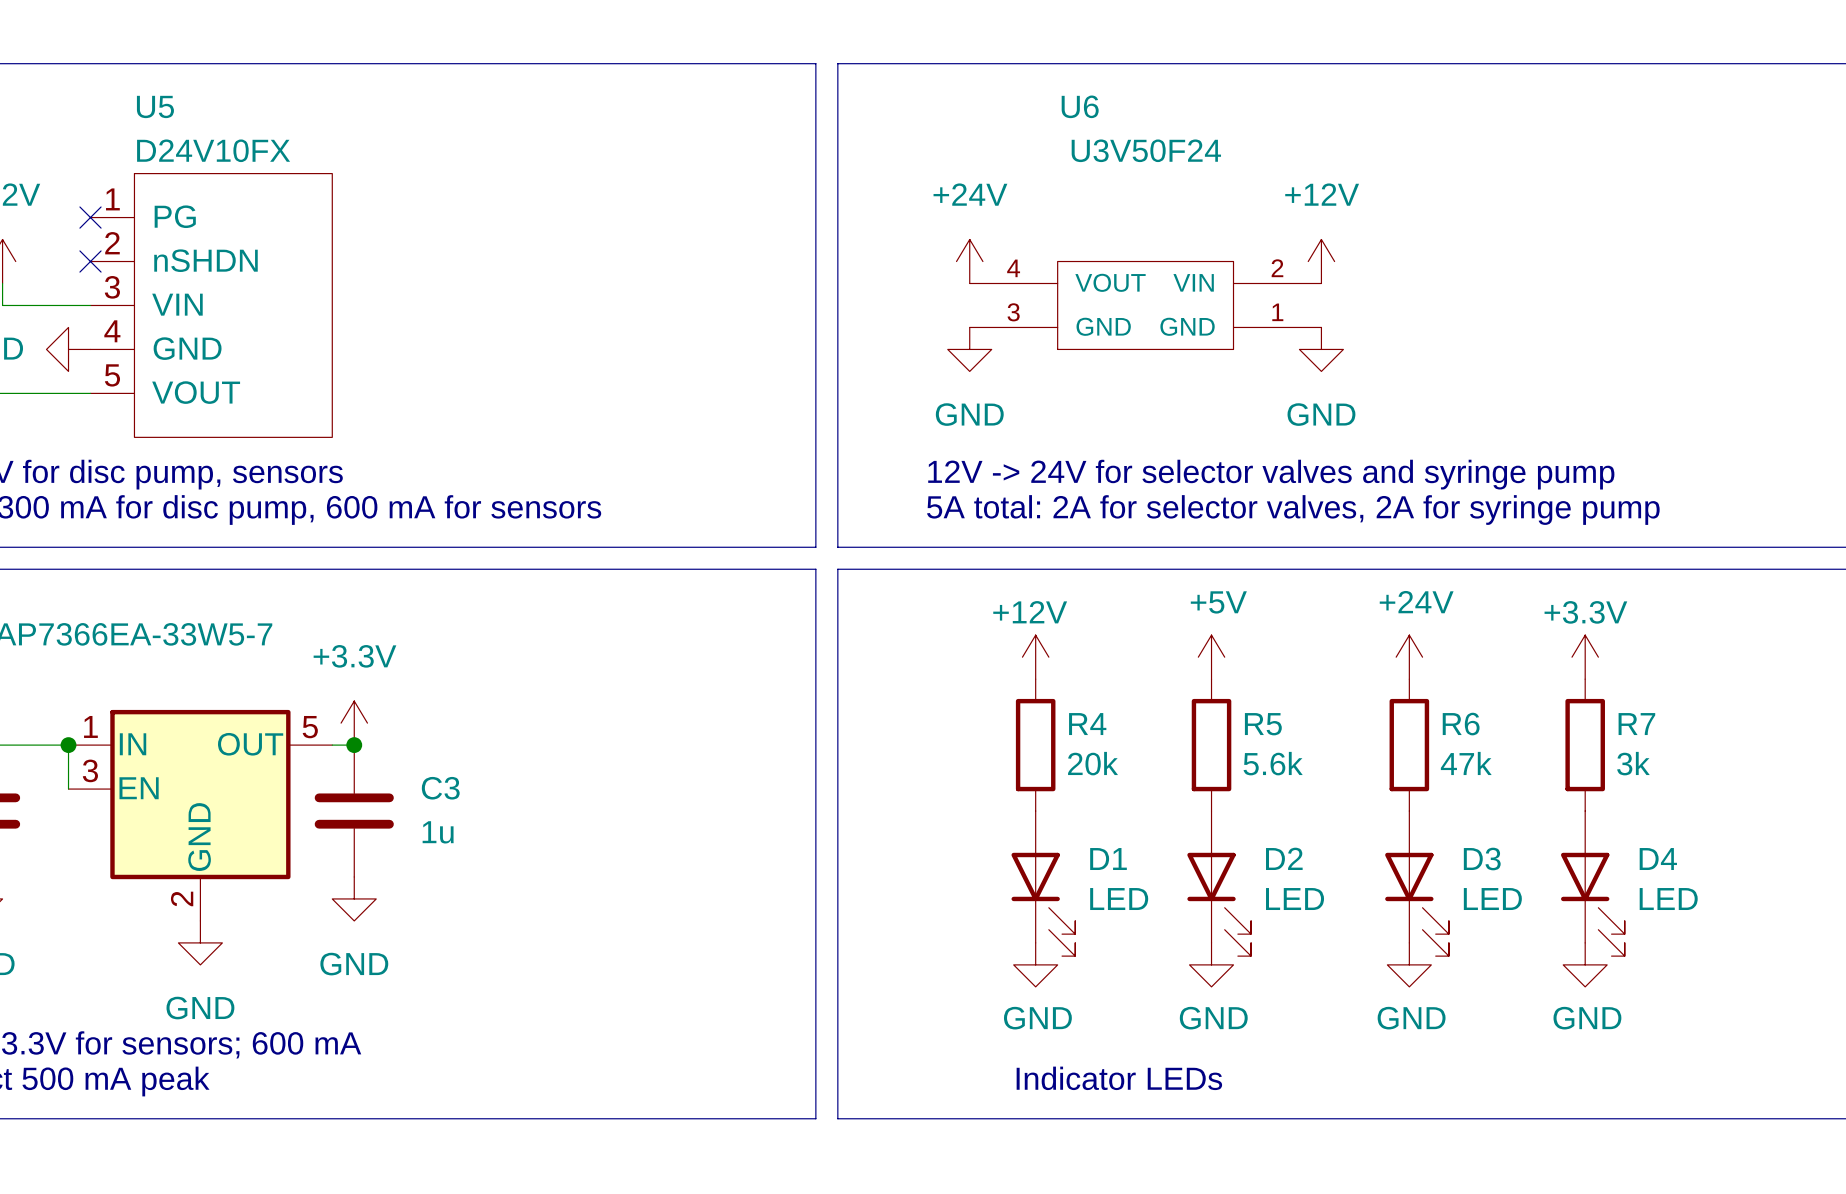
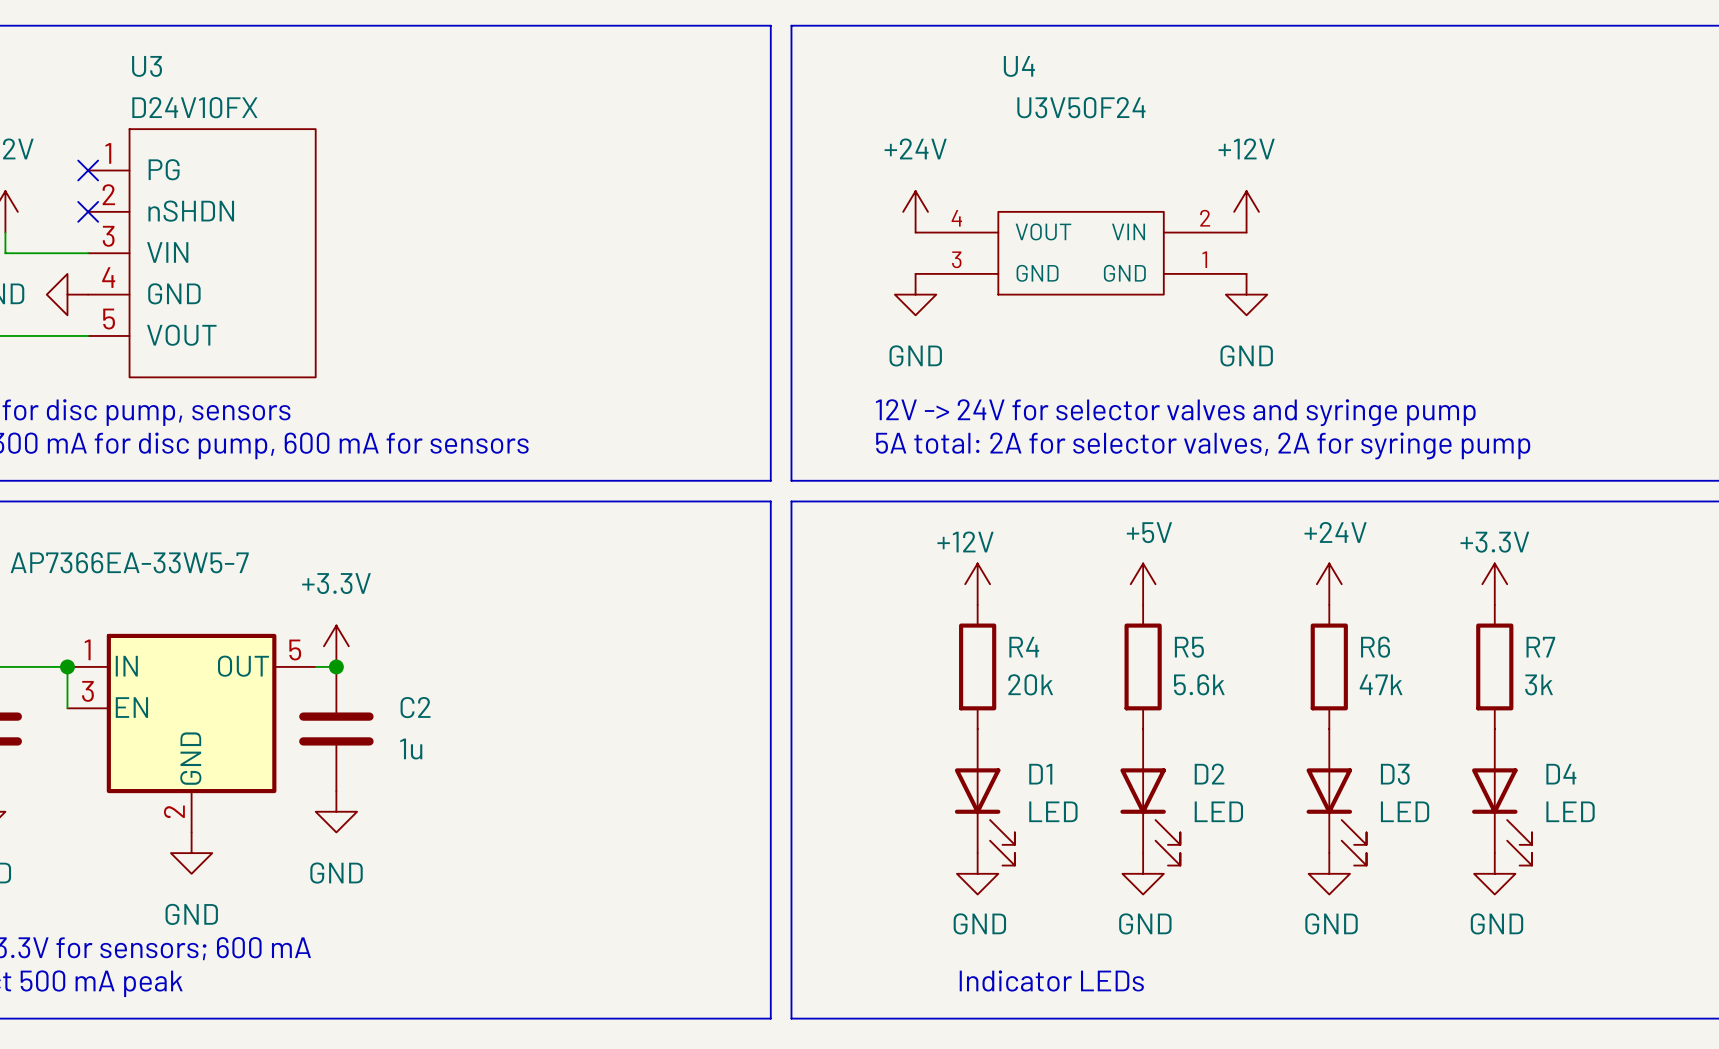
U5 name: U5 (155, 106) -> U3 (147, 66)
U6 name: U6 (1080, 106) -> U4 (1019, 66)
C3 name: C3 (440, 788) -> C2 (415, 707)

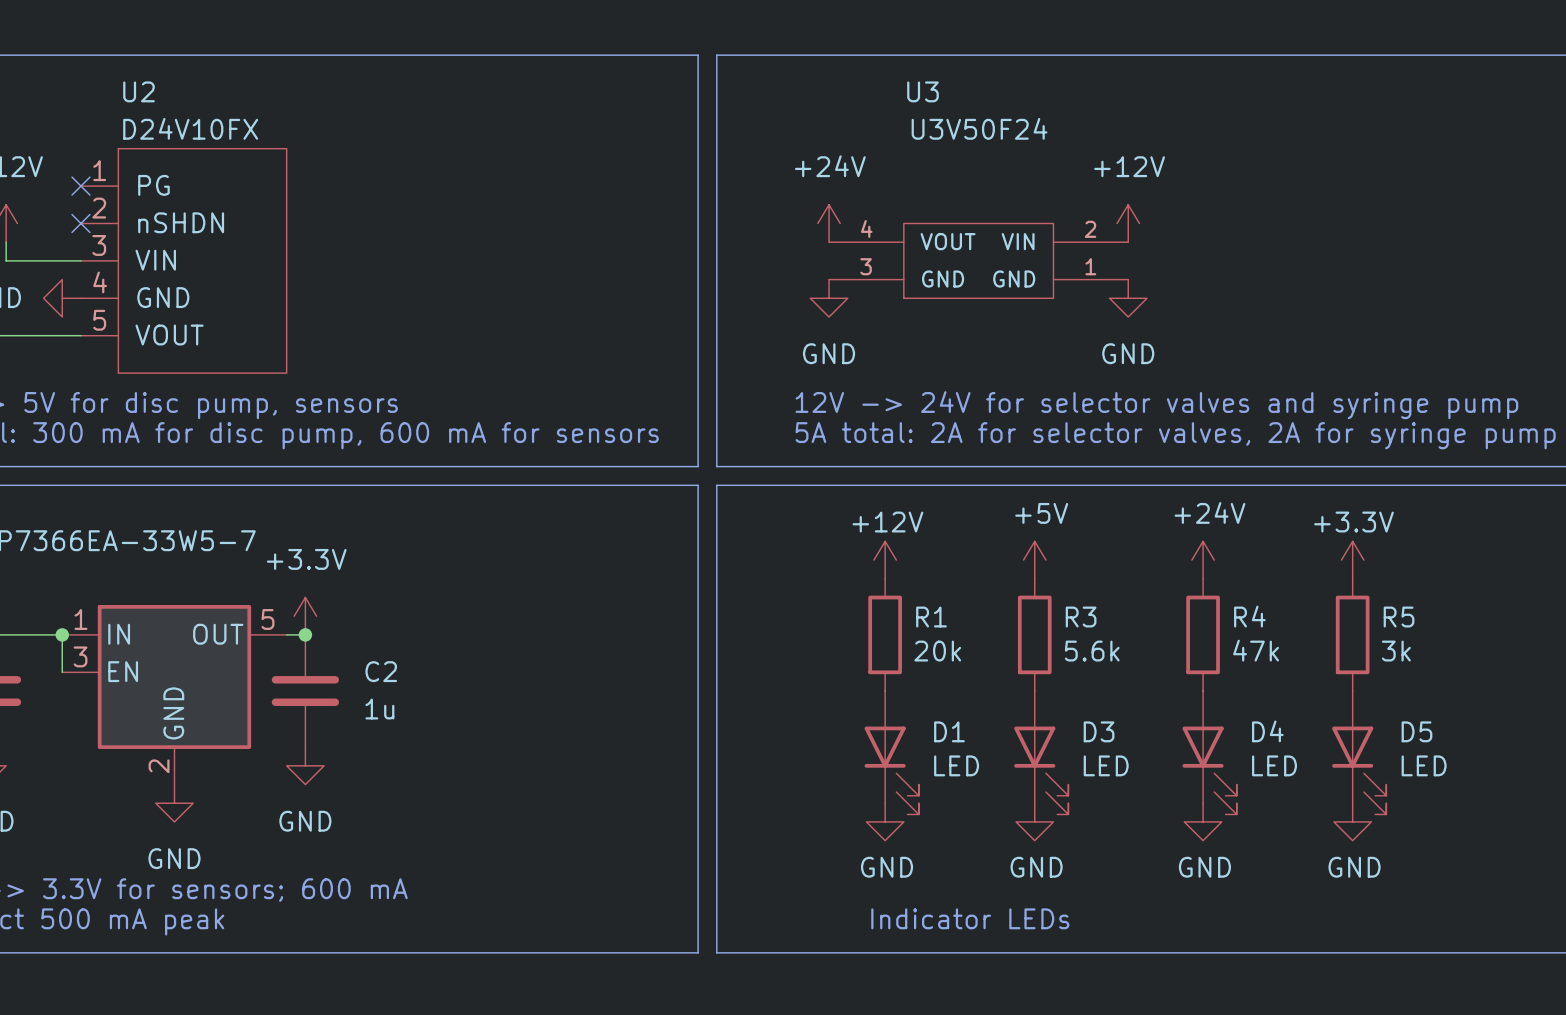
U3 name: U3 (147, 66) -> U2 (139, 91)
U4 name: U4 (1019, 66) -> U3 (922, 91)
R4 name: R4 (1024, 647) -> R1 (931, 617)
R5 name: R5 (1189, 647) -> R3 (1081, 617)
R6 name: R6 (1375, 647) -> R4 (1249, 616)
R7 name: R7 (1540, 647) -> R5 (1399, 617)
D2 name: D2 (1209, 774) -> D3 (1099, 731)
D3 name: D3 (1395, 774) -> D4 (1267, 731)
D4 name: D4 (1561, 774) -> D5 (1416, 731)

